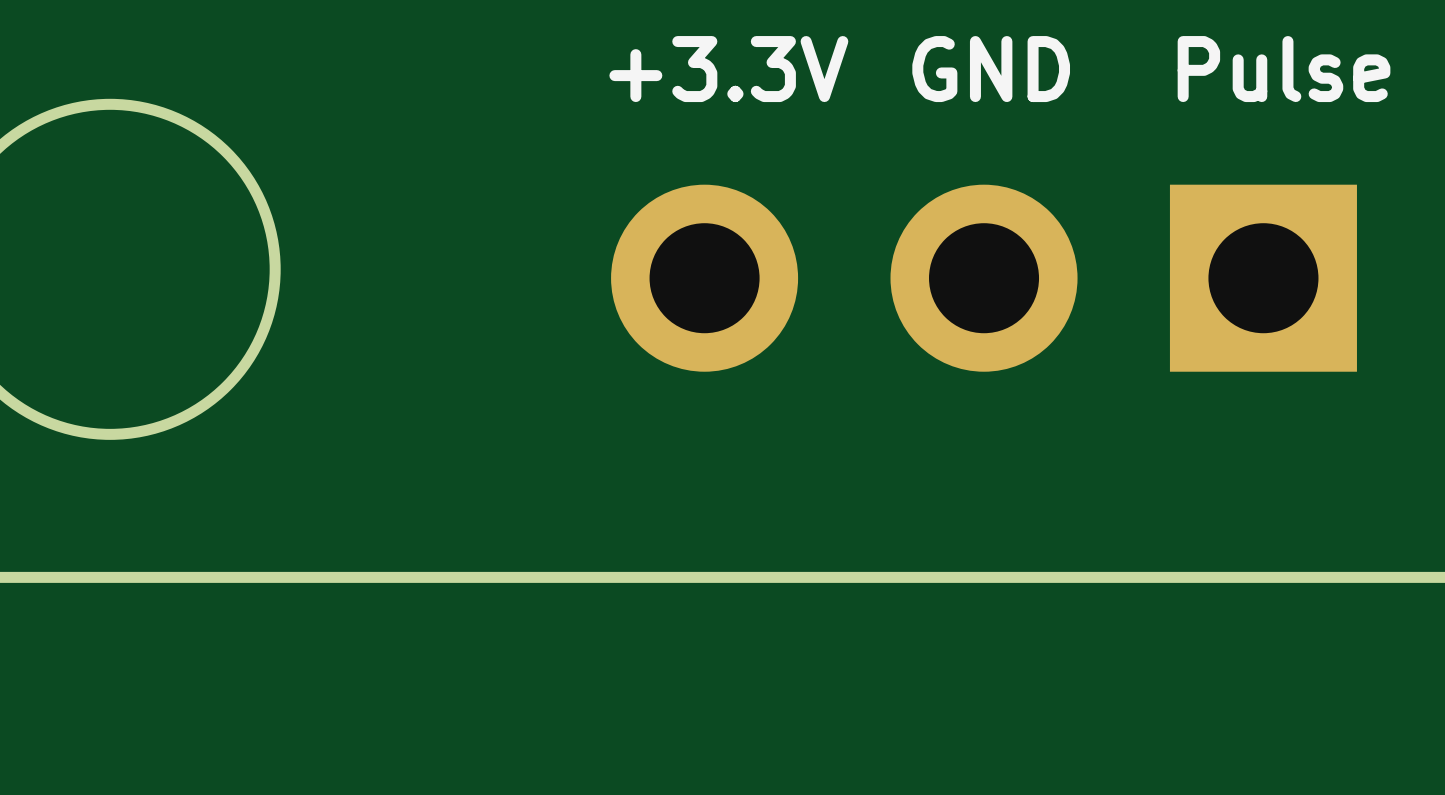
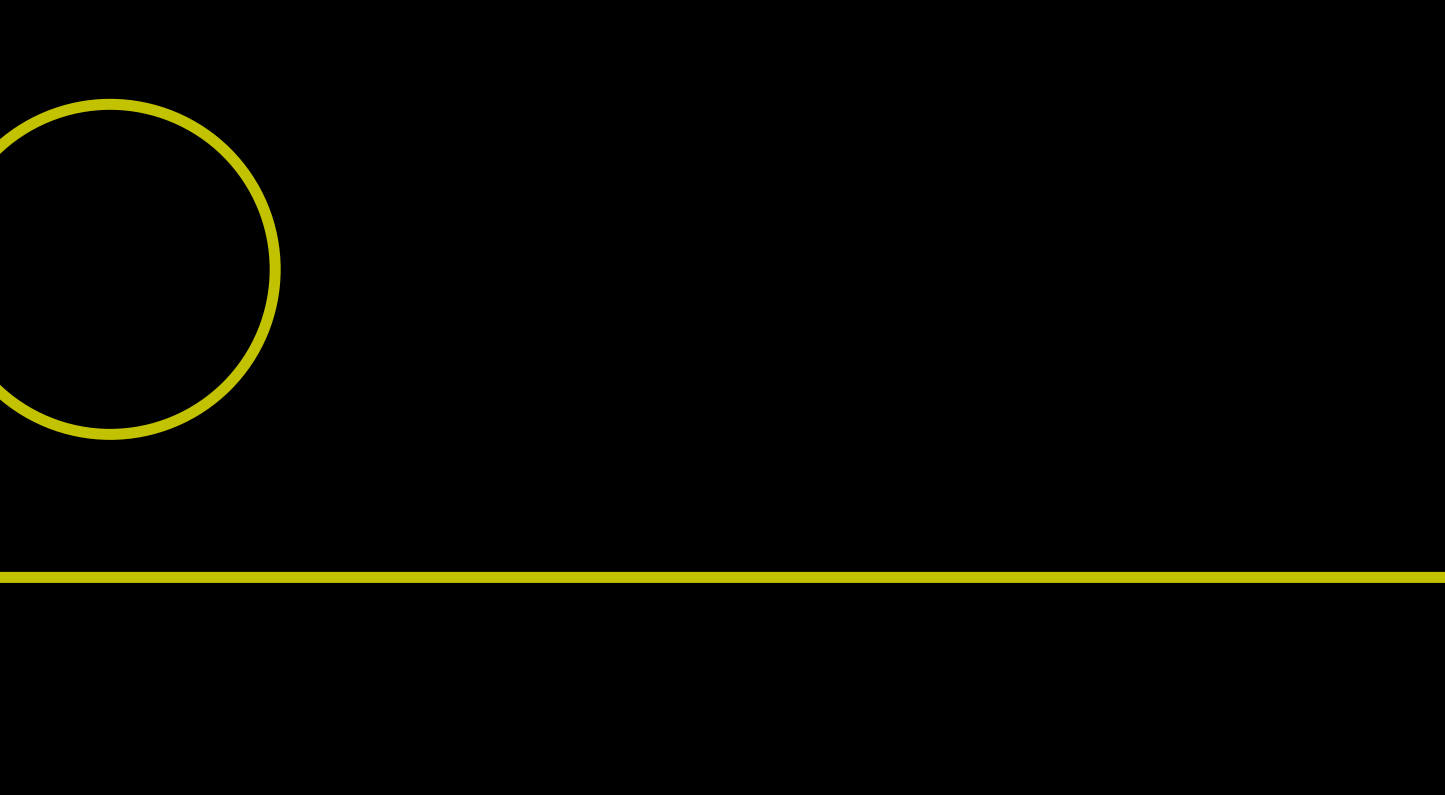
text: +3.3V (728, 69) -> none
text: GND (991, 69) -> none
text: Pulse (1284, 69) -> none
part: (984, 278) -> none

